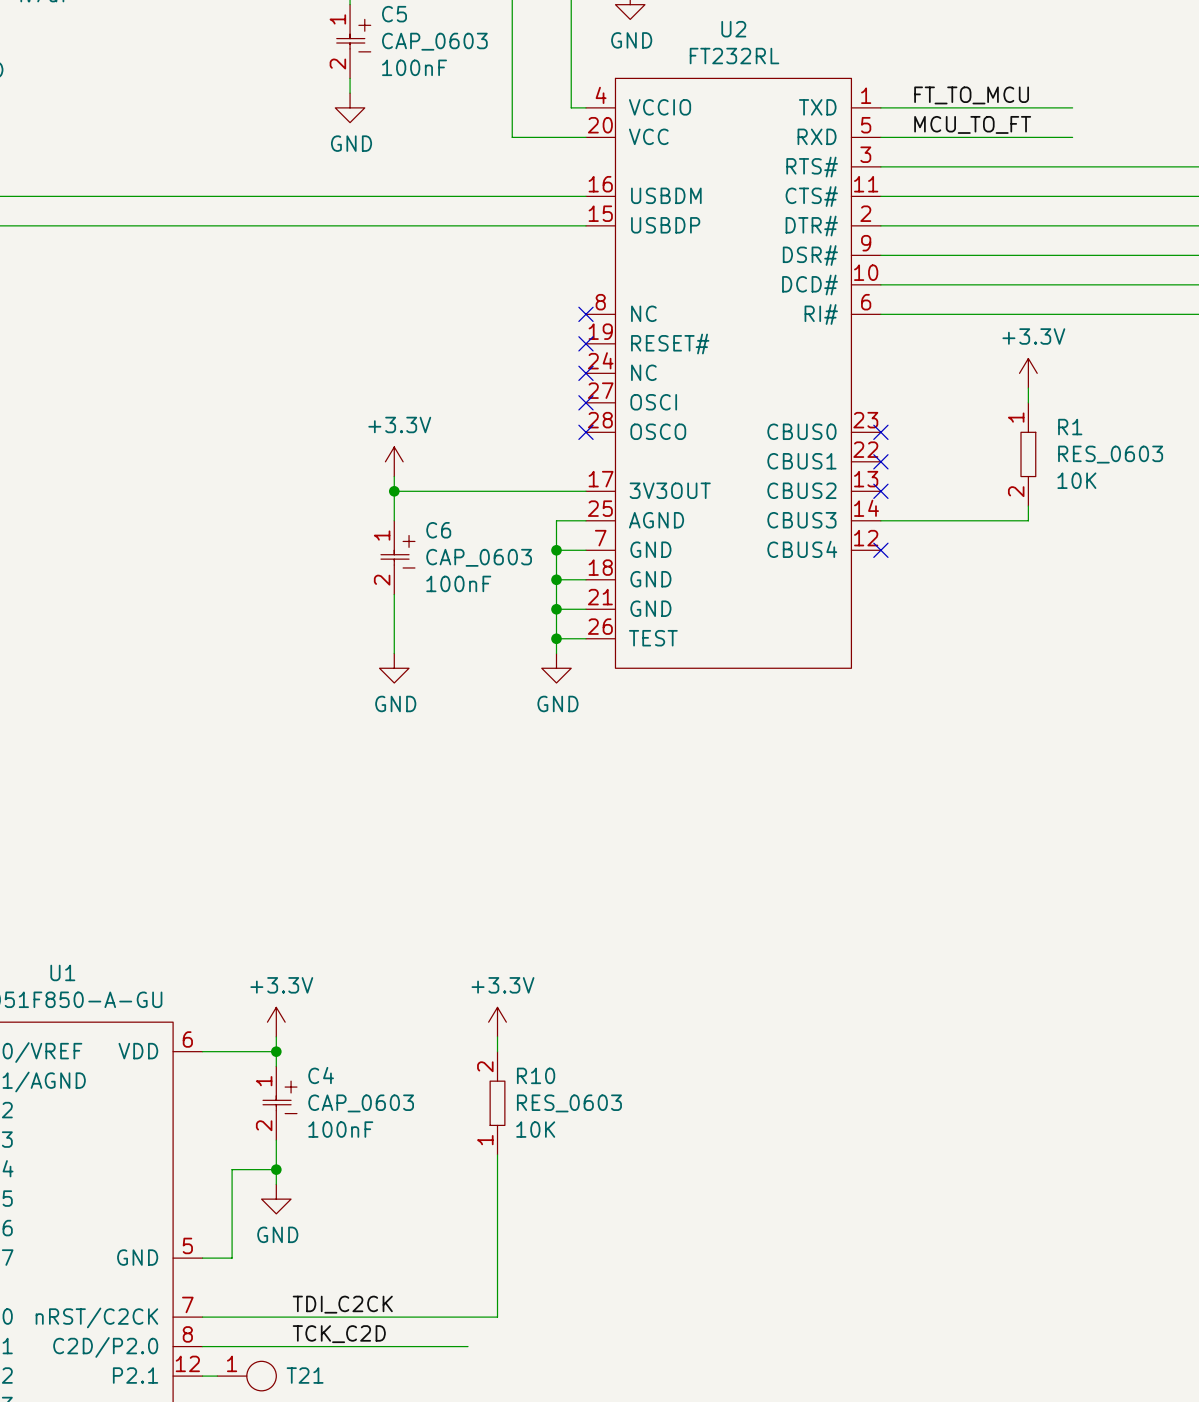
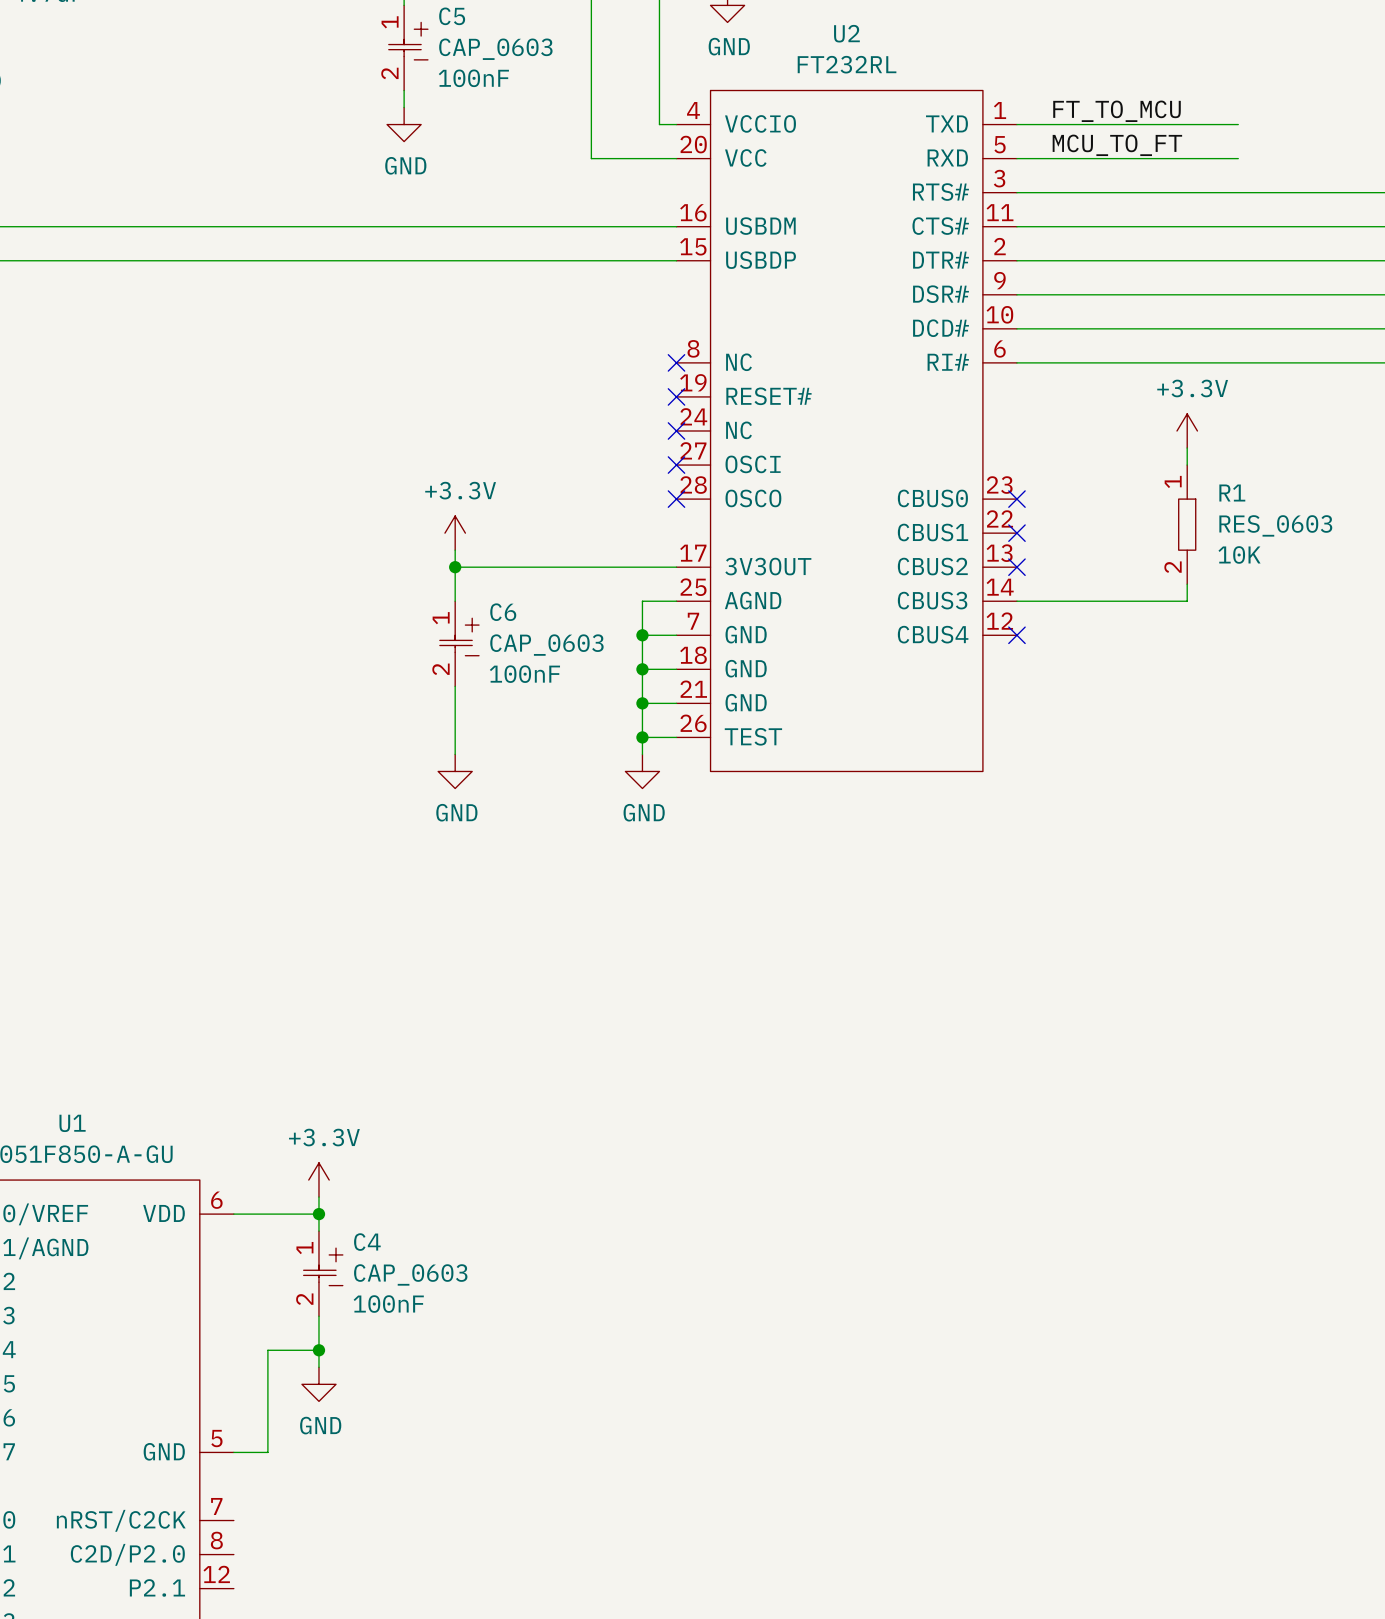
power symbol: +3.3V (497, 1022) -> none
wire: (497, 1036) (497, 1051) -> none
R10: RES_0603 (497, 1103) -> none
wire: (497, 1154) (497, 1317) (202, 1317) -> none
label: TDI_C2CK (342, 1304) -> none
label: TCK_C2D (339, 1334) -> none
wire: (202, 1346) (468, 1346) -> none
wire: (202, 1376) (217, 1376) -> none
T21: (246, 1376) -> none

